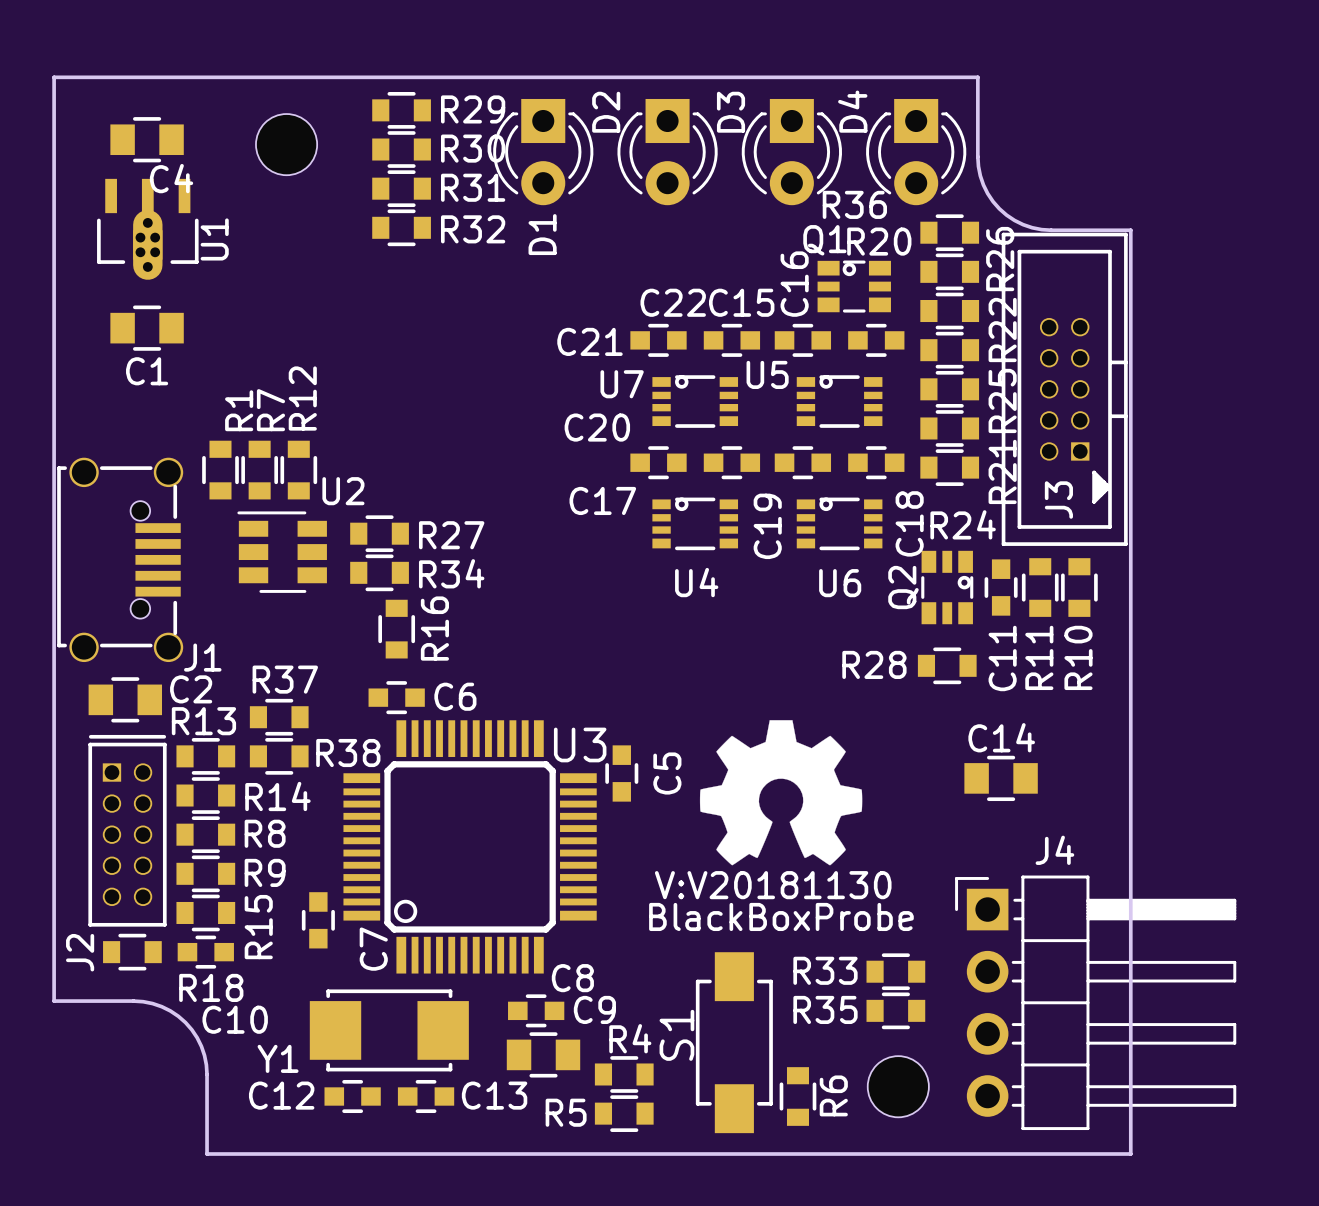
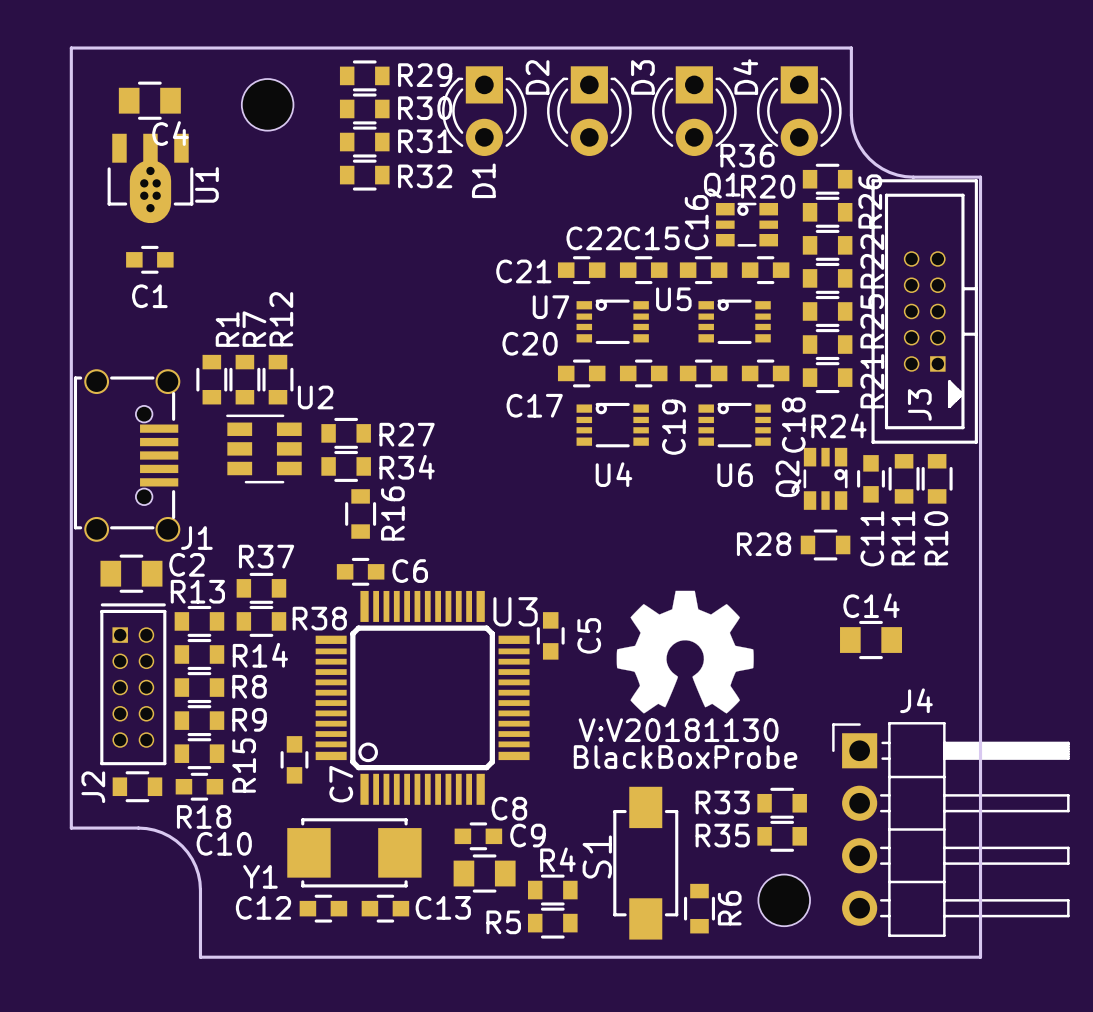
U1 footprint: [97, 178, 199, 280] -> [107, 133, 194, 224]
C1 footprint: [110, 305, 184, 351] -> [126, 245, 174, 274]

